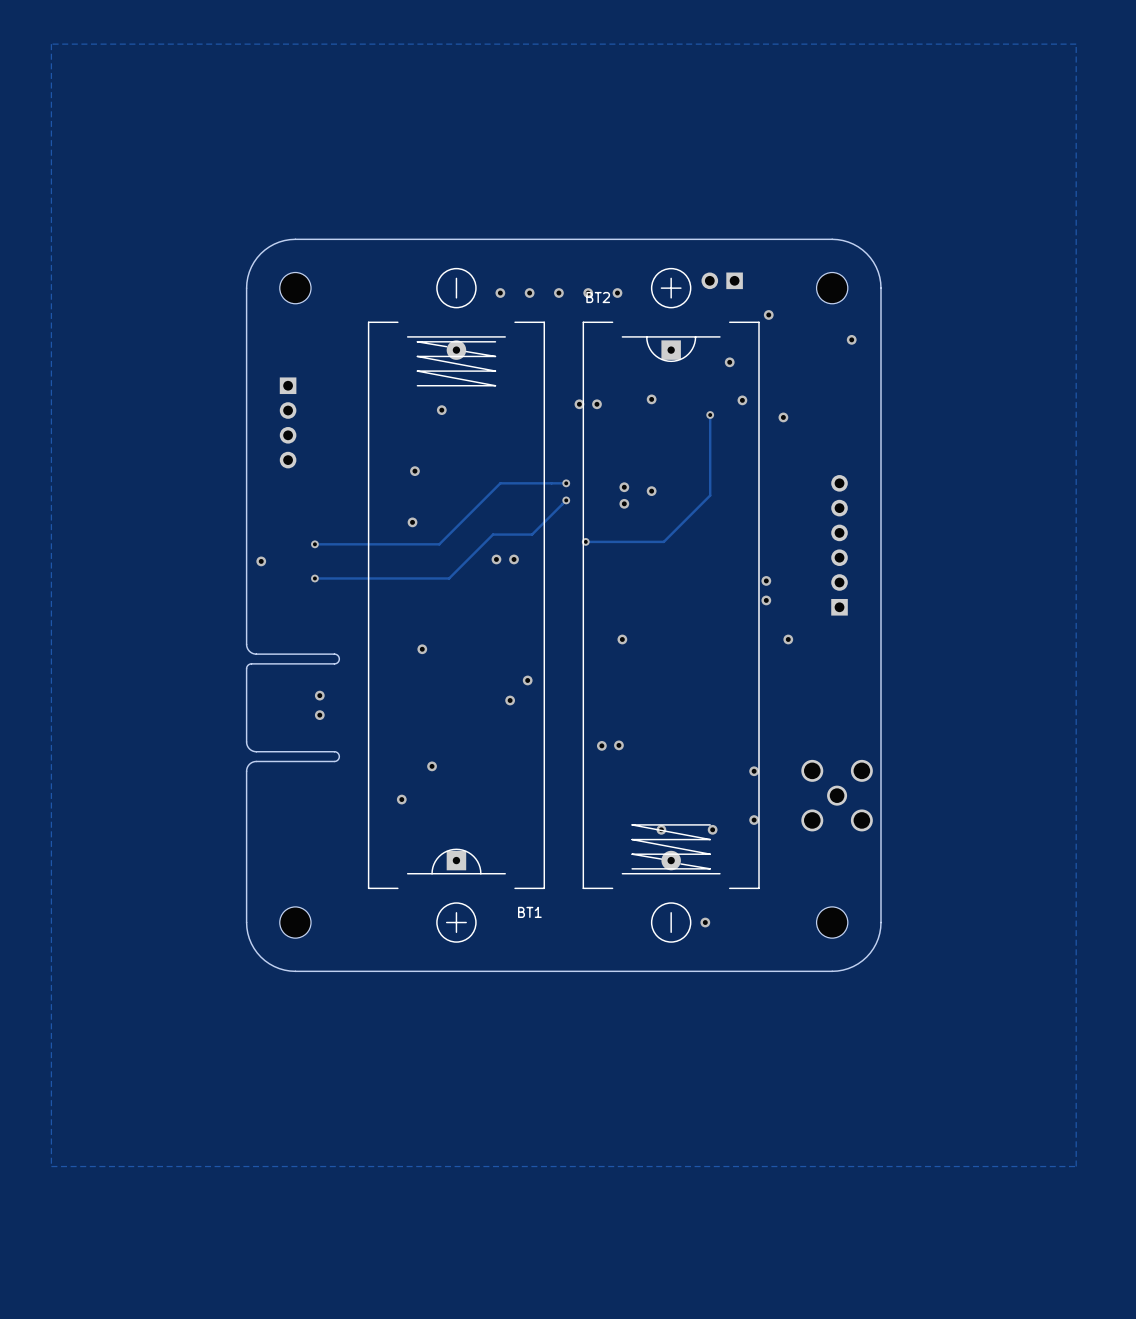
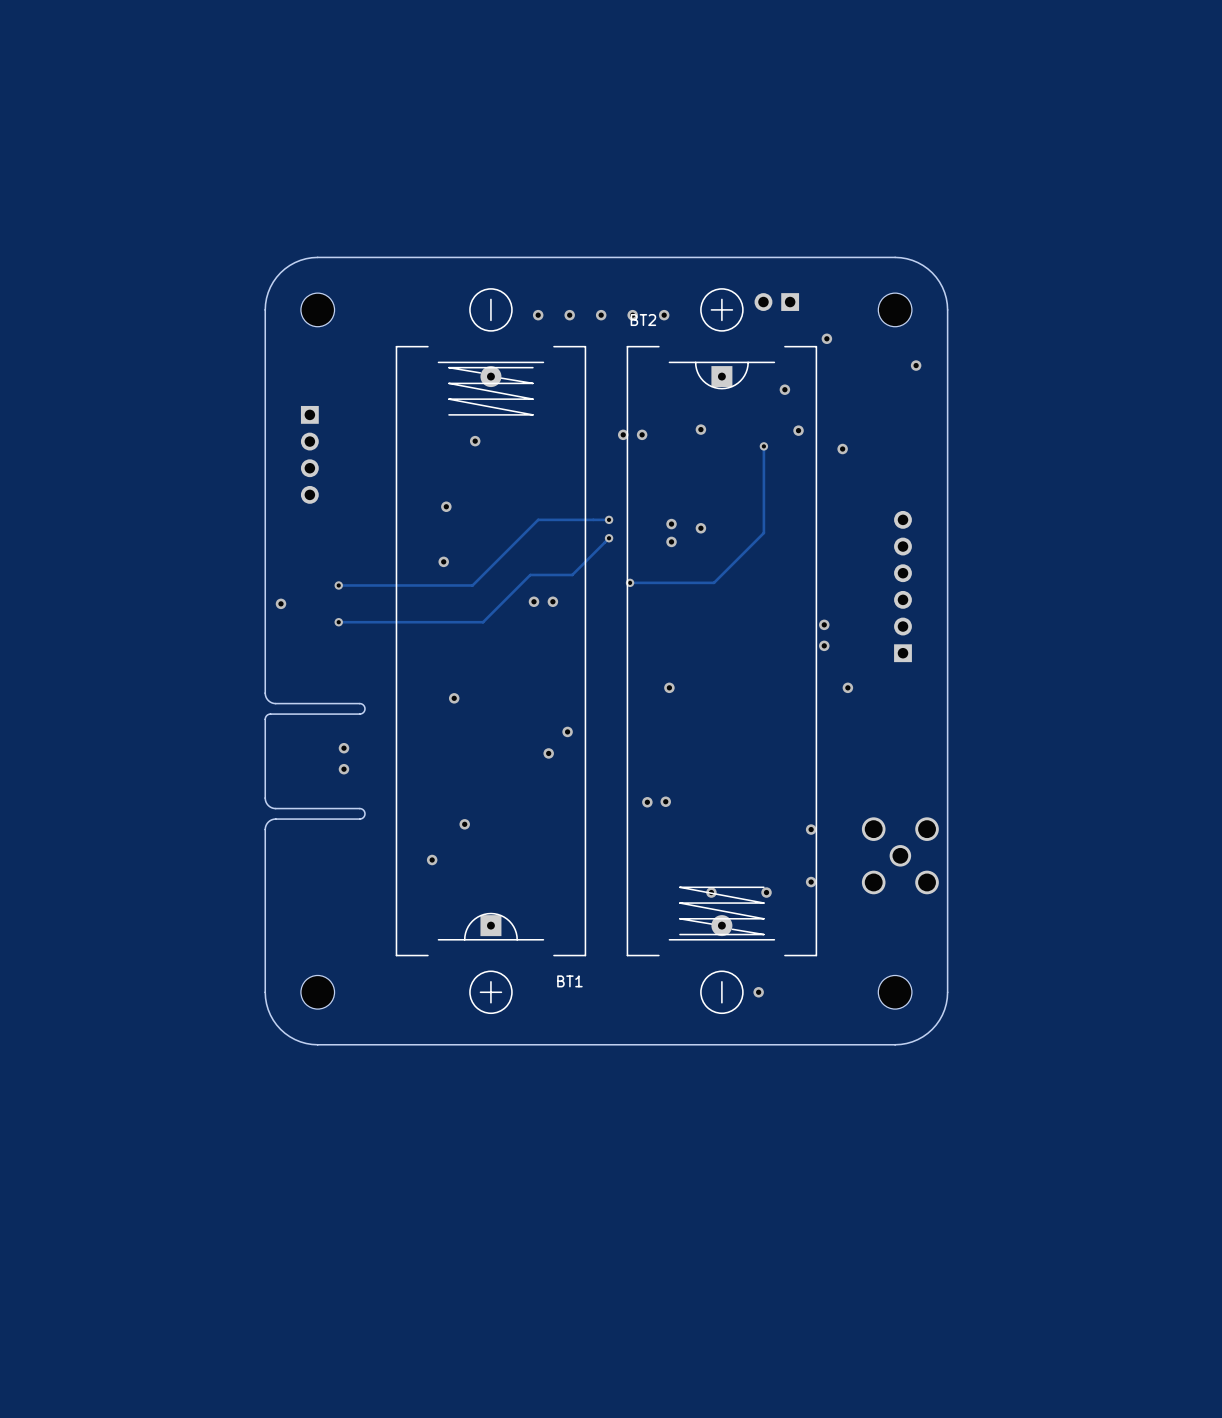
zone outline: (1076, 44) (51, 44) (51, 1166) (1076, 1166) (1076, 44) -> none

